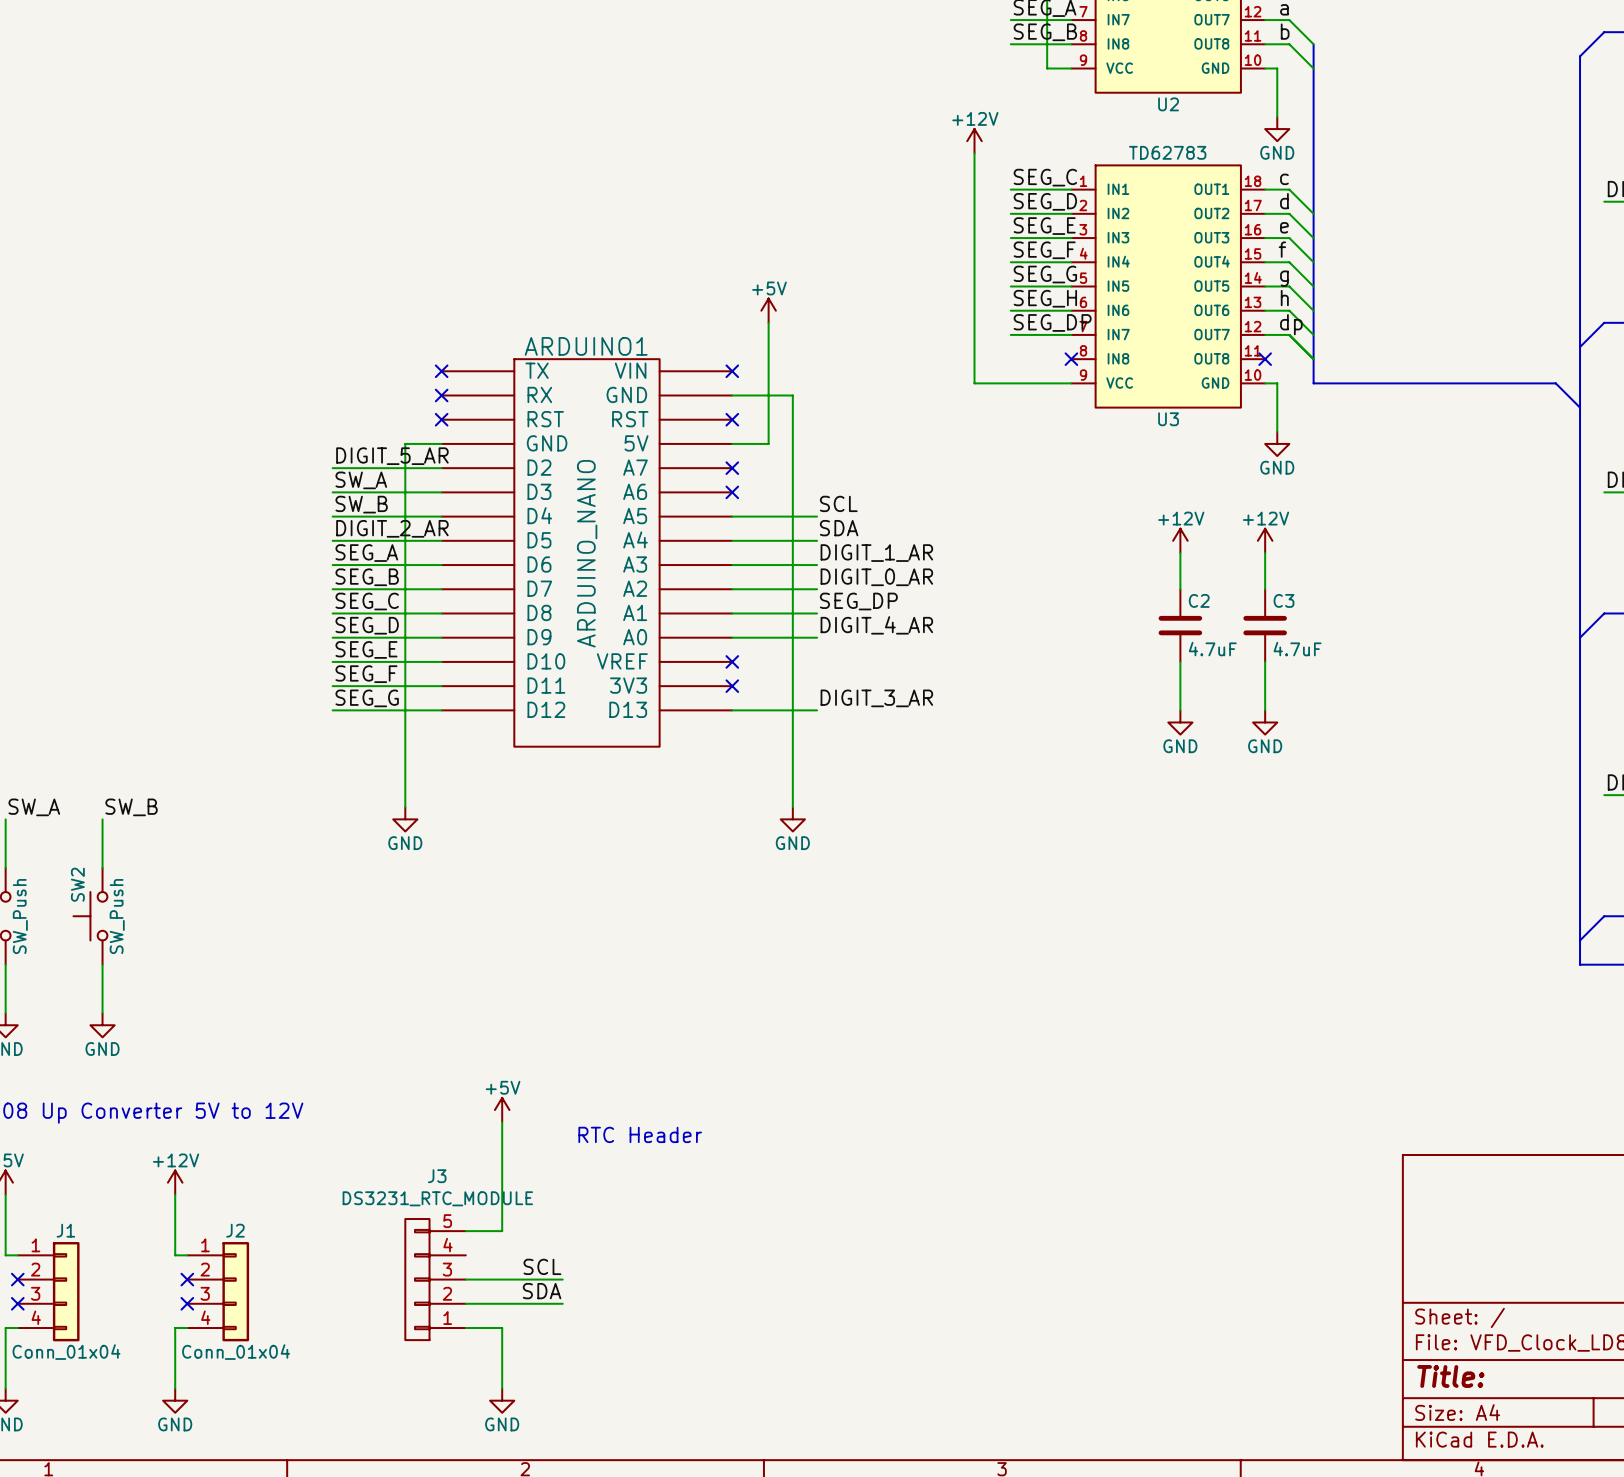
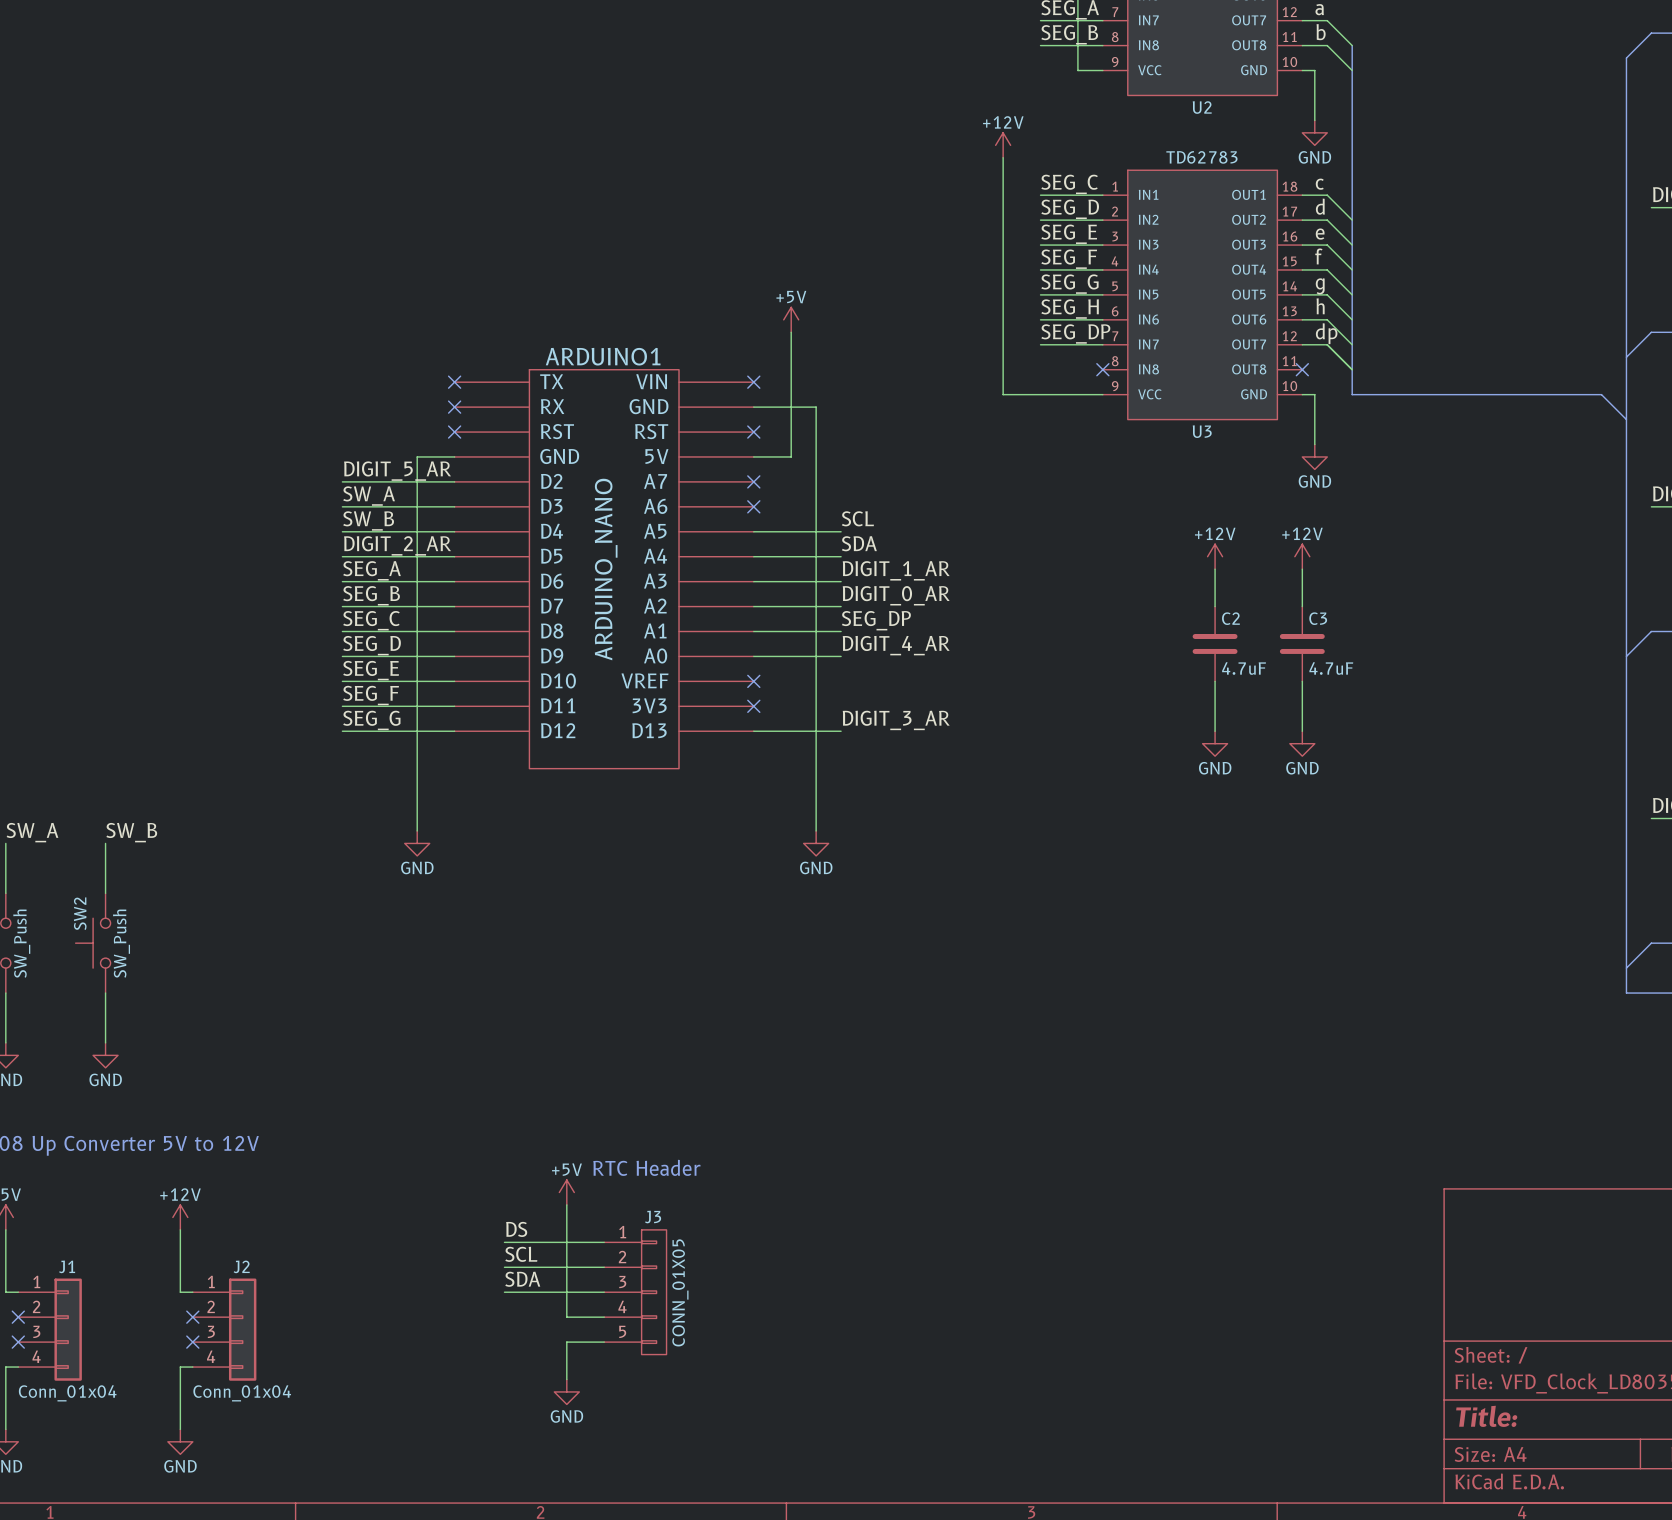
power symbol position: +5V (502, 1110) -> +5V (566, 1192)
wire: (502, 1122) (502, 1231) -> (604, 1267) (516, 1267)
J3 name position: J3 (437, 1176) -> J3 (653, 1217)
label: none -> DS (516, 1229)
J3 value: DS3231_RTC_MODULE (437, 1198) -> CONN_01X05 (680, 1292)
wire: none -> (504, 1242) (604, 1242)
wire: (465, 1231) (490, 1231) -> (579, 1317) (604, 1317)
wire: none -> (504, 1292) (604, 1292)
label position: SCL (542, 1266) -> SCL (521, 1254)
J3 rotation: 0° (417, 1279) -> 180° (654, 1292)
J3 position: (435, 1279) -> (635, 1292)
wire: (465, 1279) (550, 1279) -> (566, 1204) (566, 1317)
label position: SDA (542, 1291) -> SDA (522, 1279)
wire: (465, 1303) (550, 1303) -> (566, 1379) (566, 1342)
wire: none -> (579, 1342) (604, 1342)
wire: (465, 1328) (502, 1328) (502, 1388) -> none
power symbol position: GND (502, 1400) -> GND (566, 1391)

